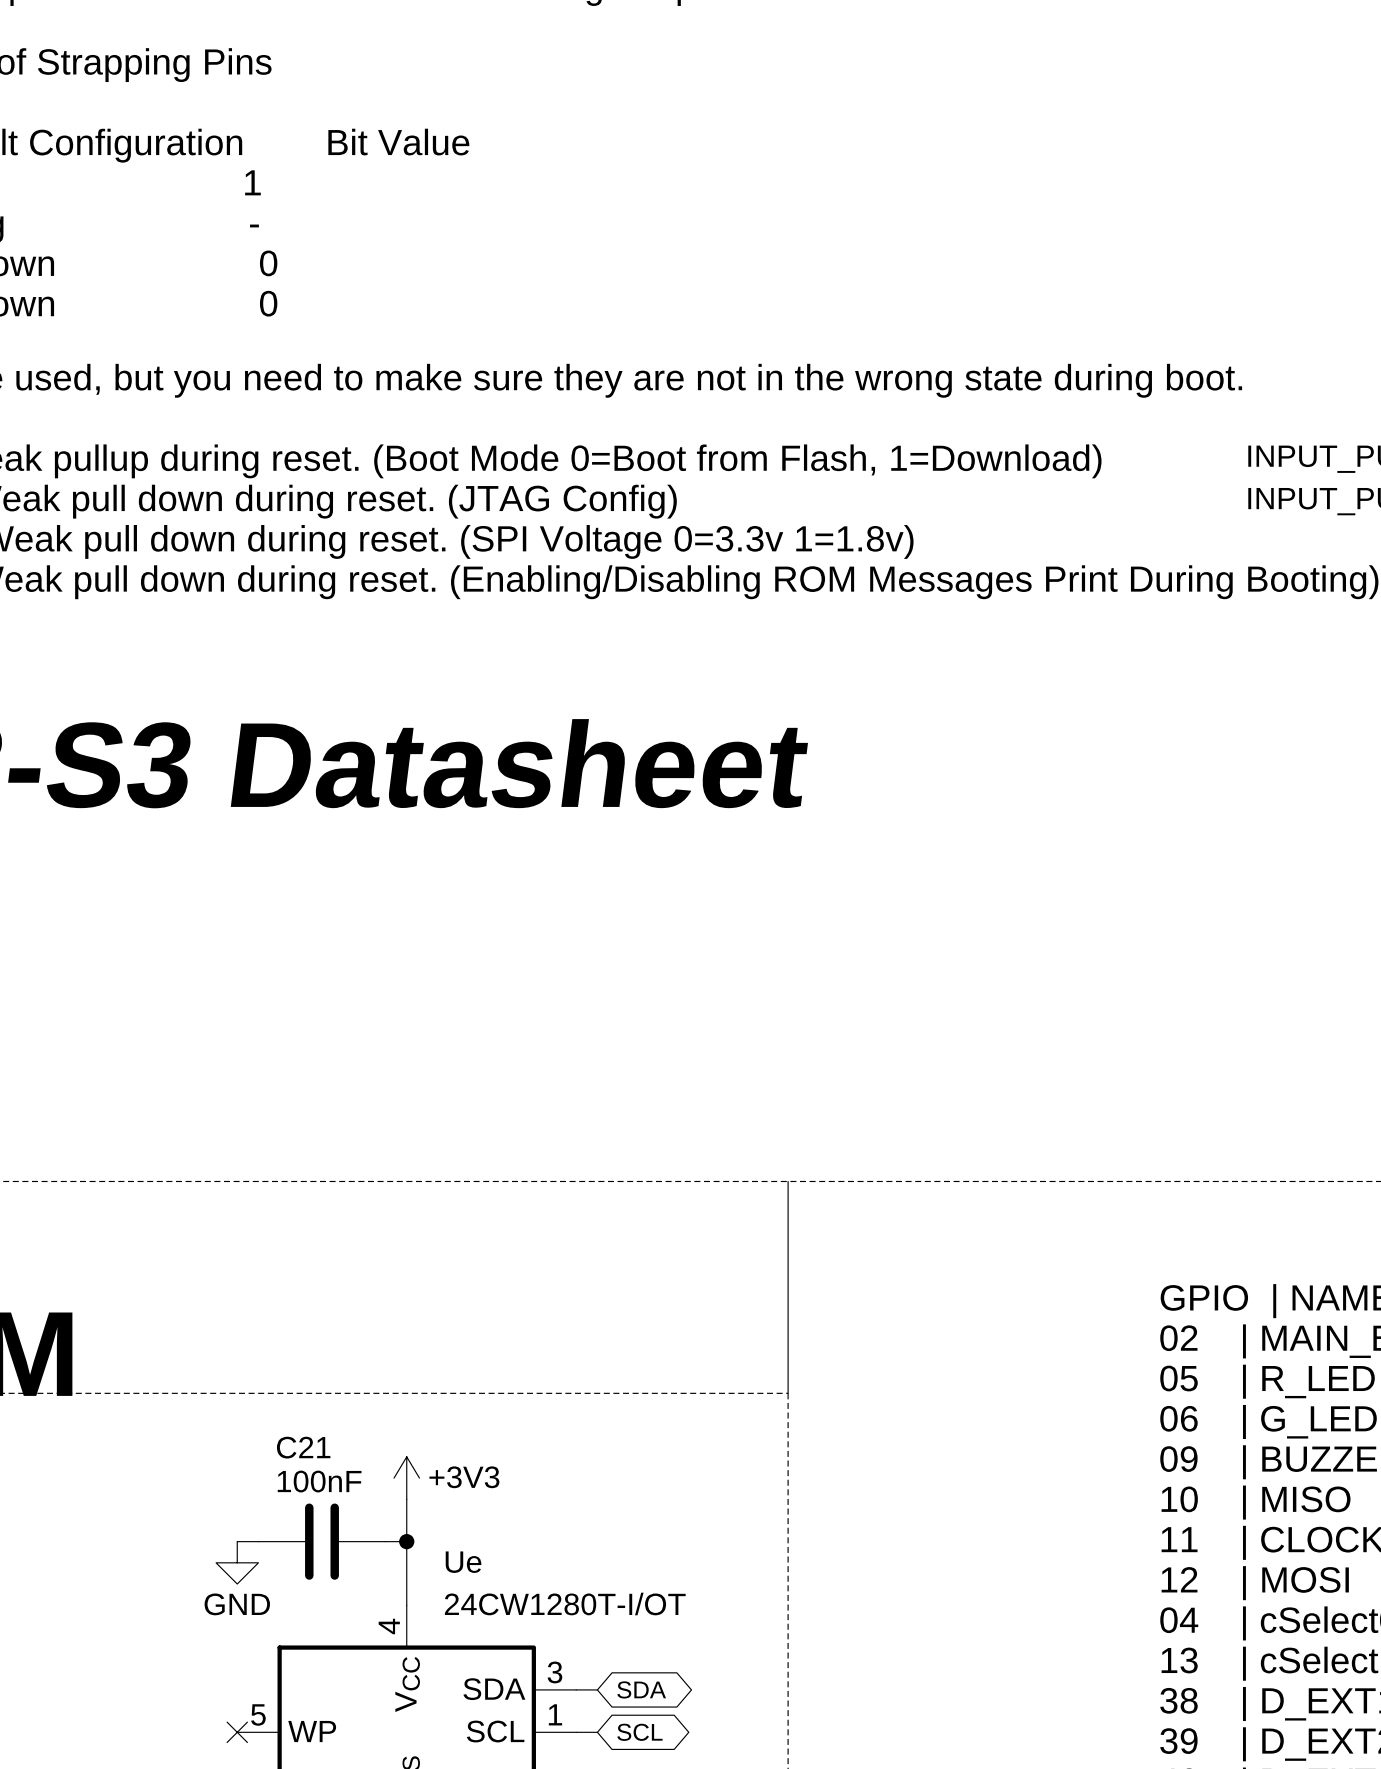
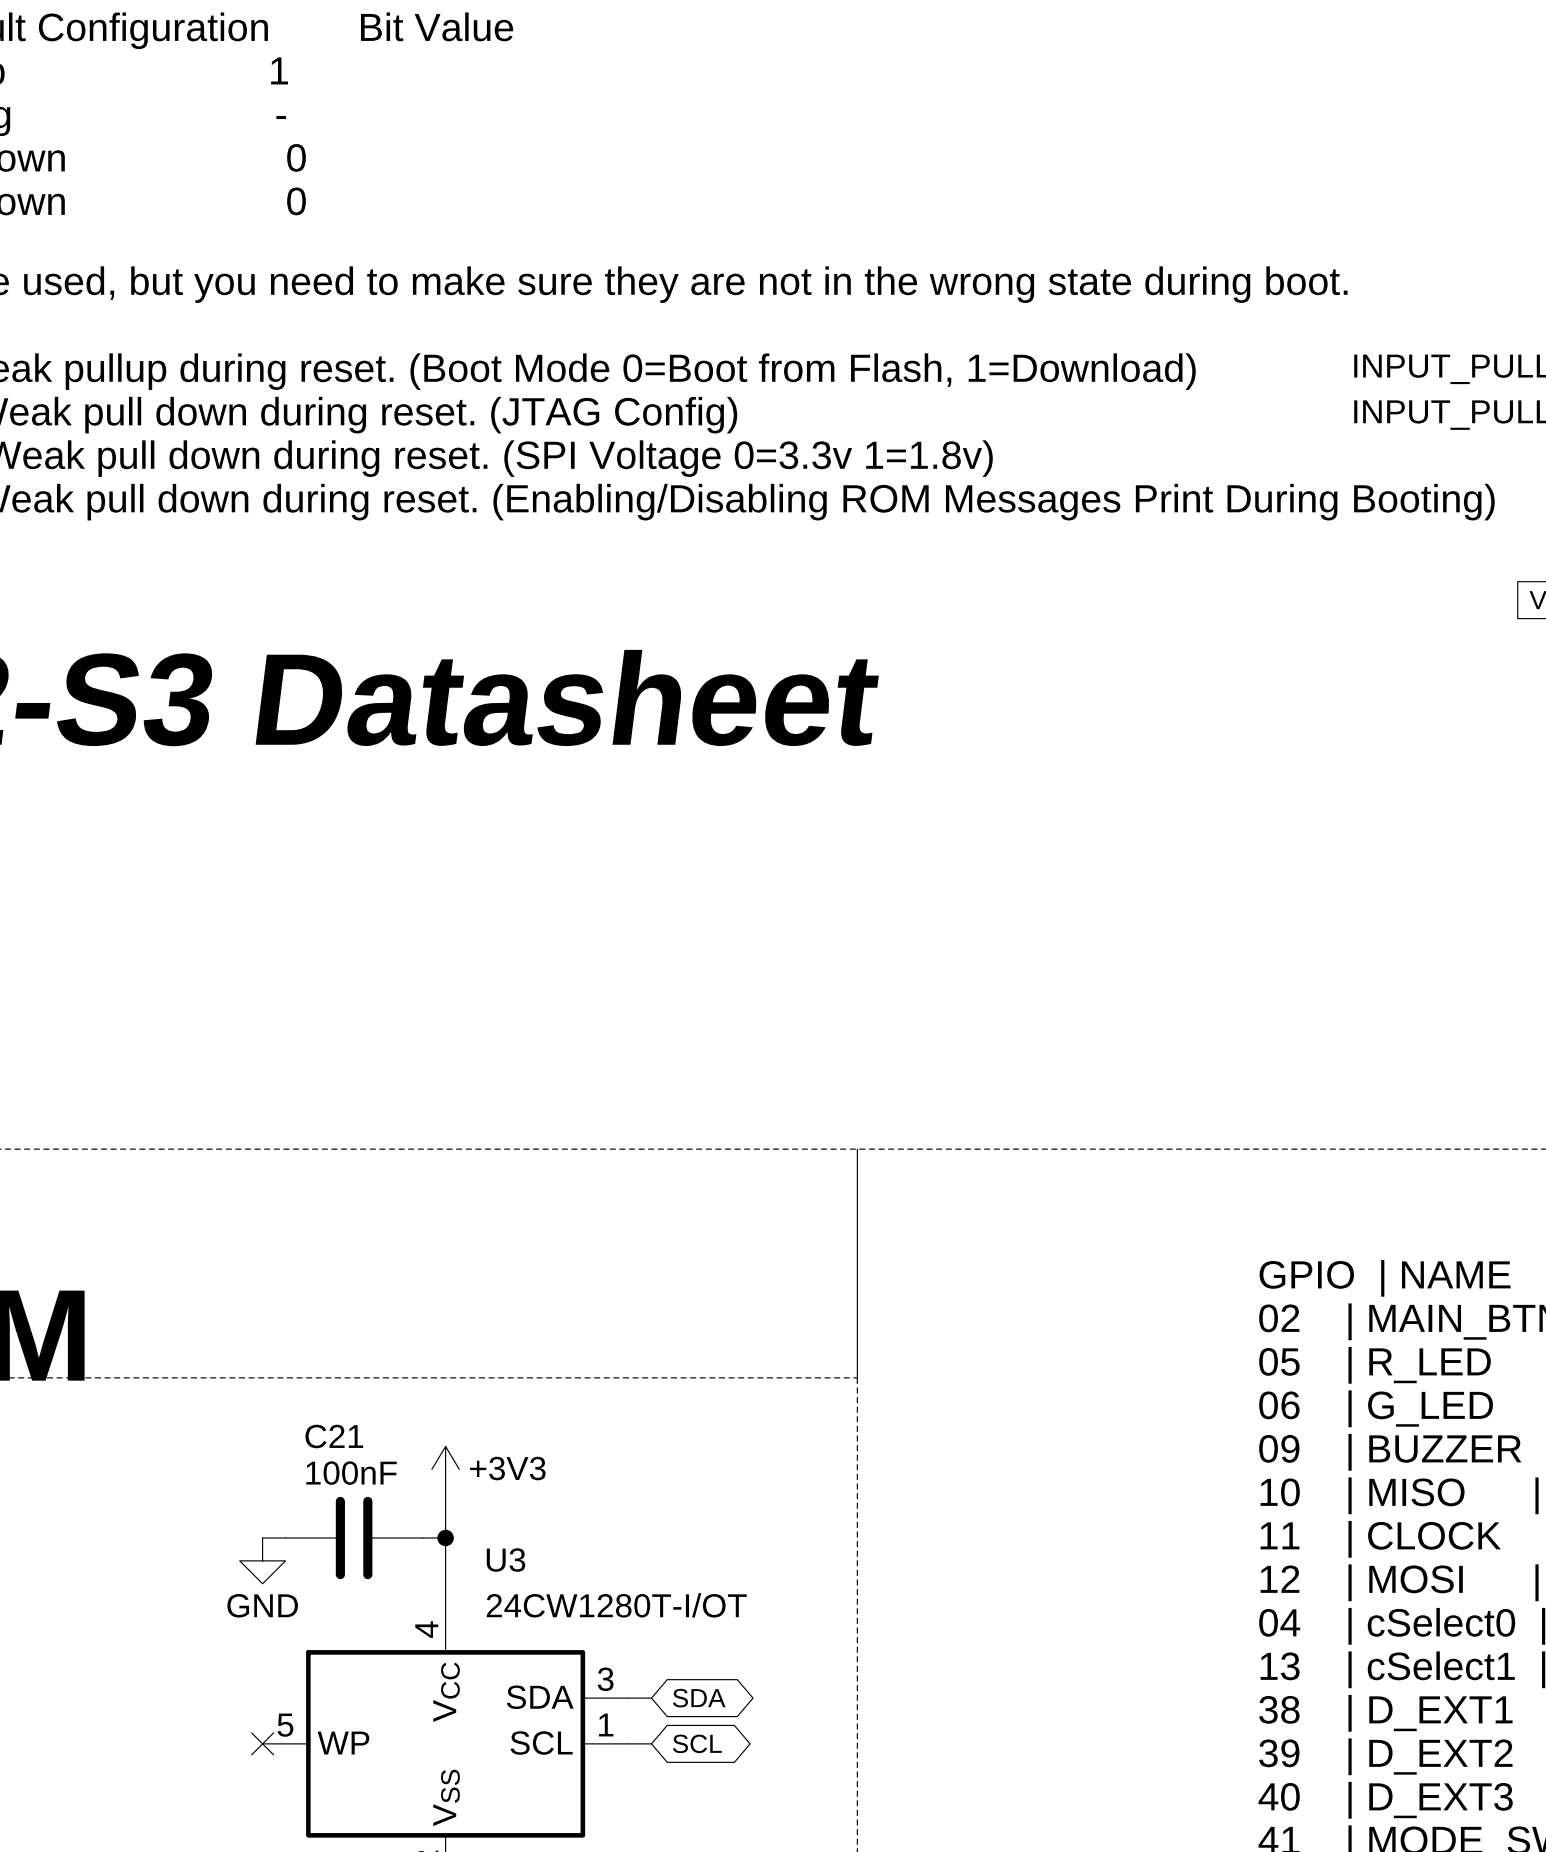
Ue name: Ue (463, 1562) -> U3 (506, 1560)

